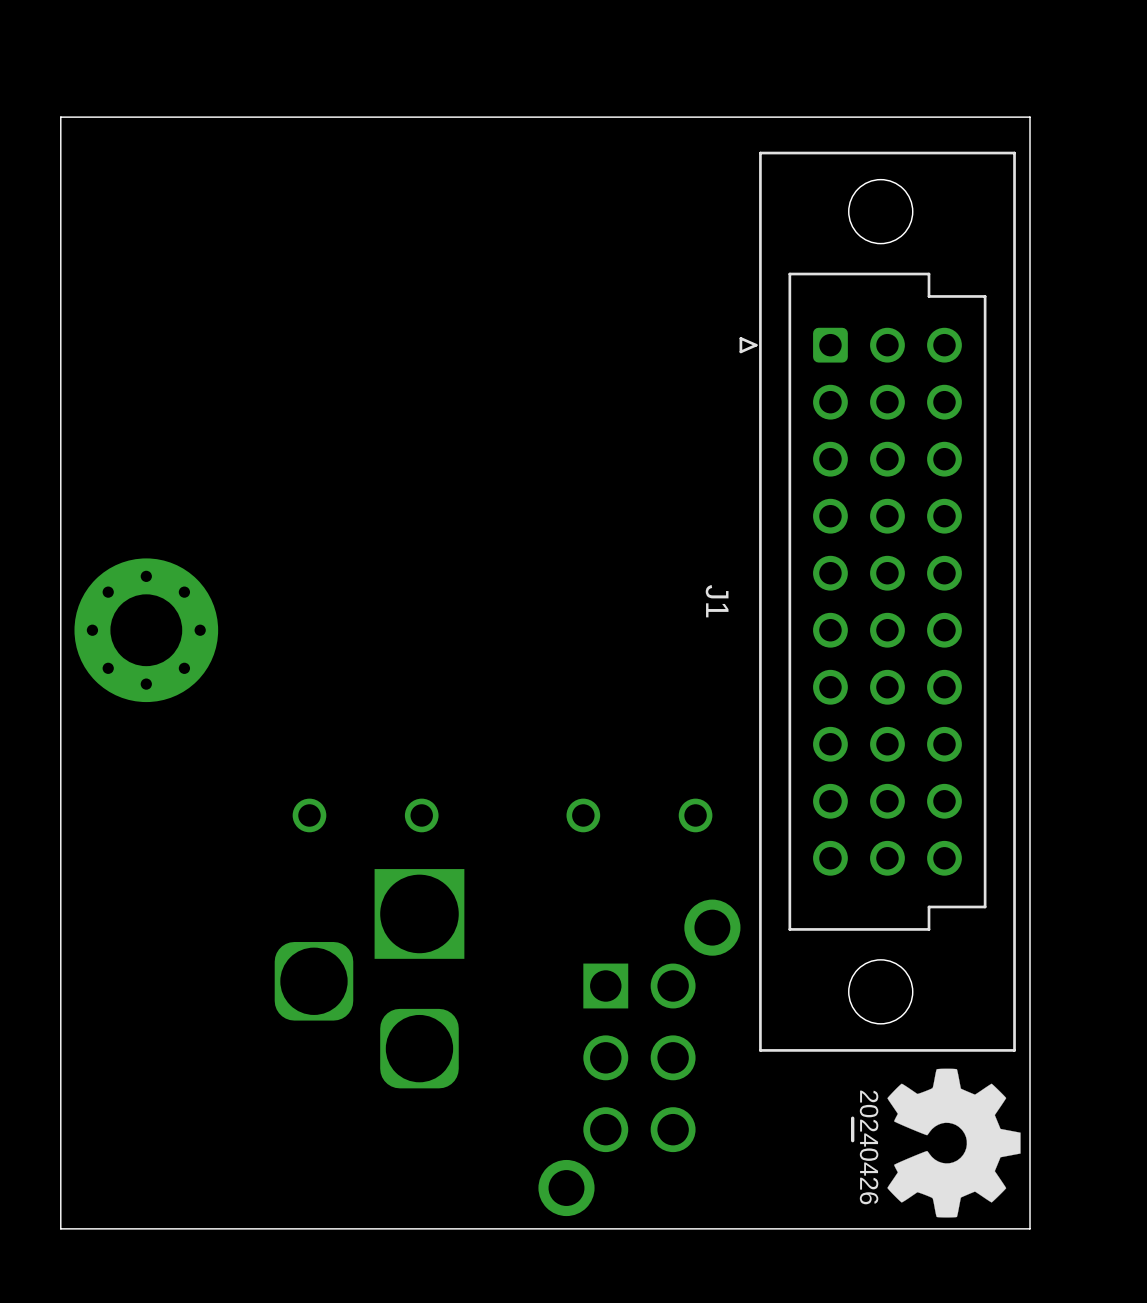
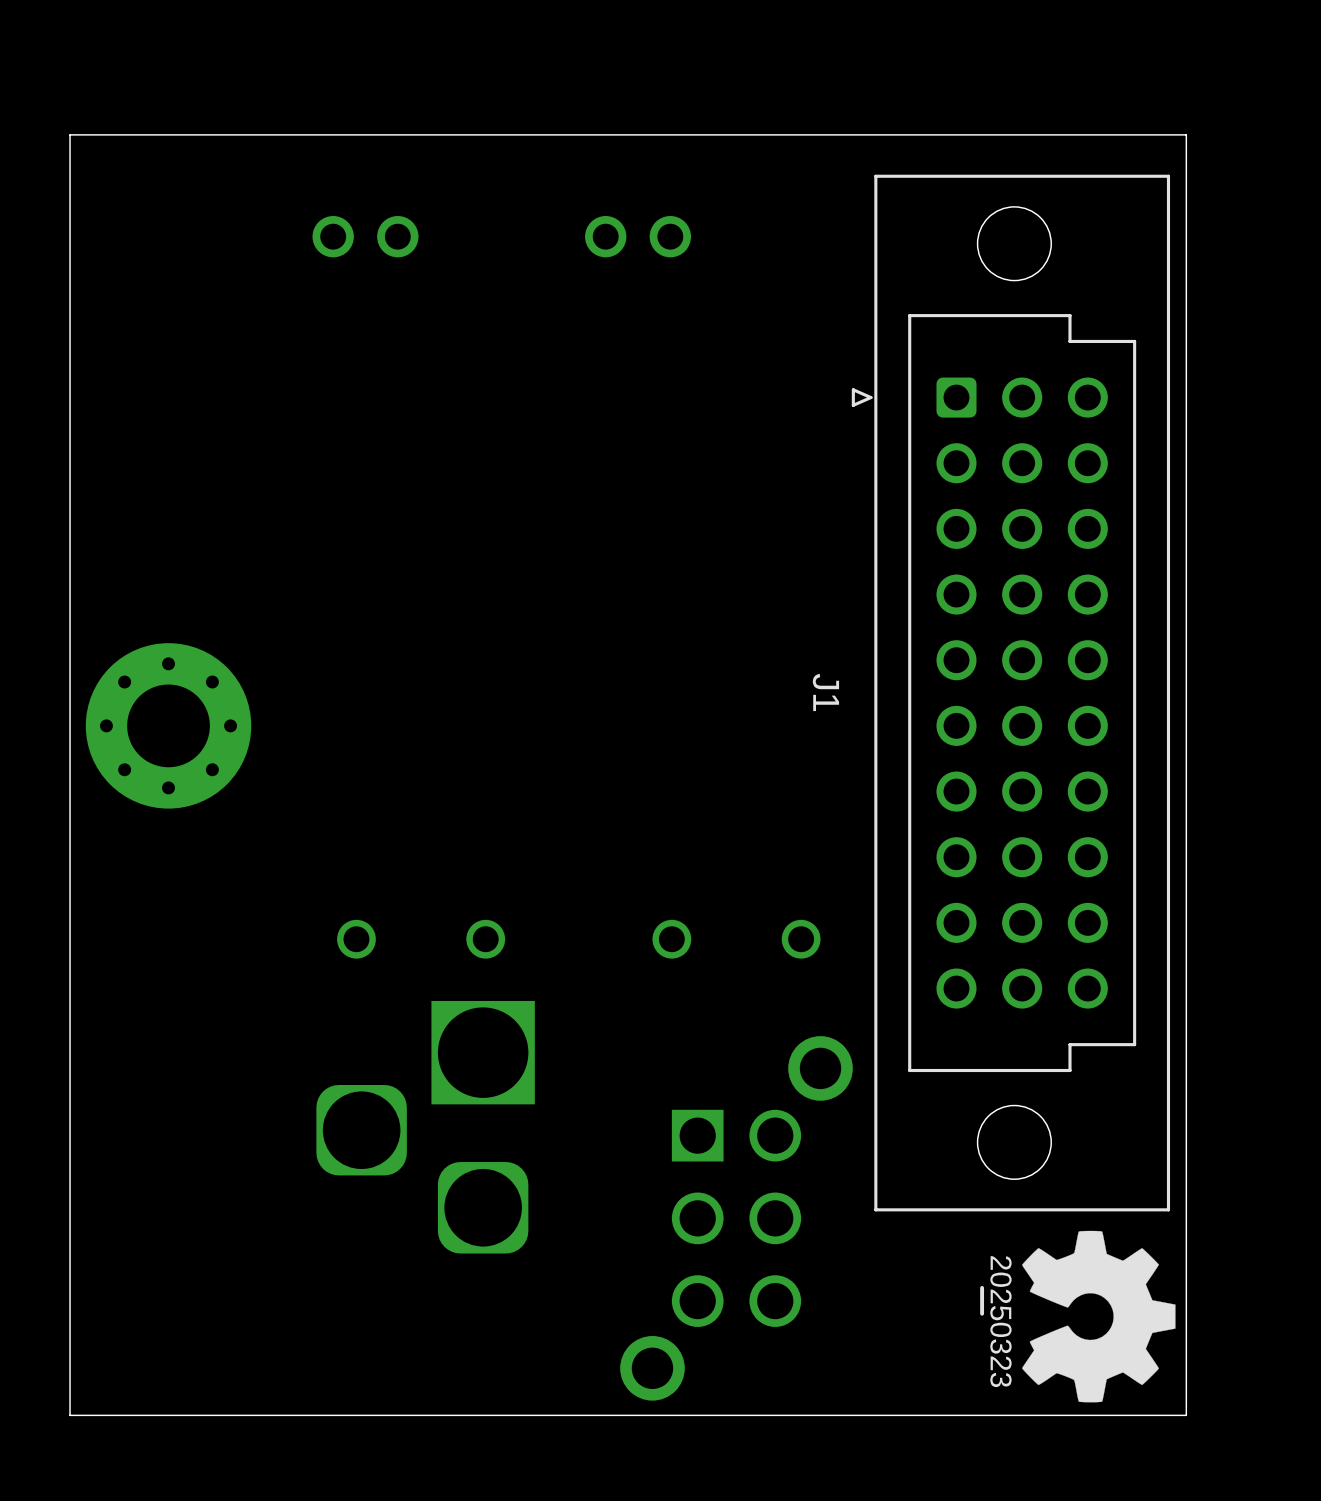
part: none -> (365, 236)
part: none -> (638, 236)
drawing shape: [851, 1090, 879, 1205] -> [980, 1256, 1012, 1388]

